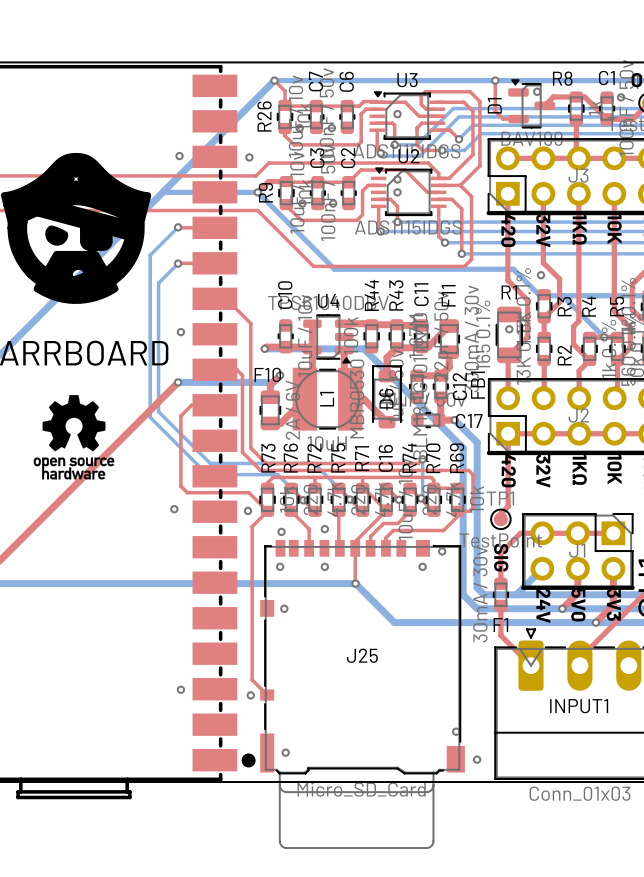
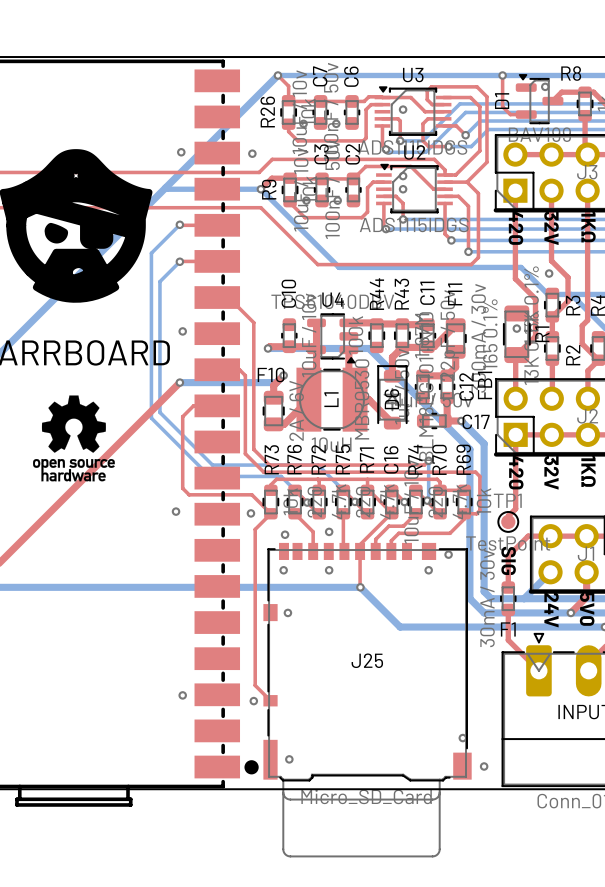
R1 name rotation: 0° (509, 292) -> 90° counterclockwise (542, 334)
R1 name position: R1 (509, 292) -> R1 (542, 334)

